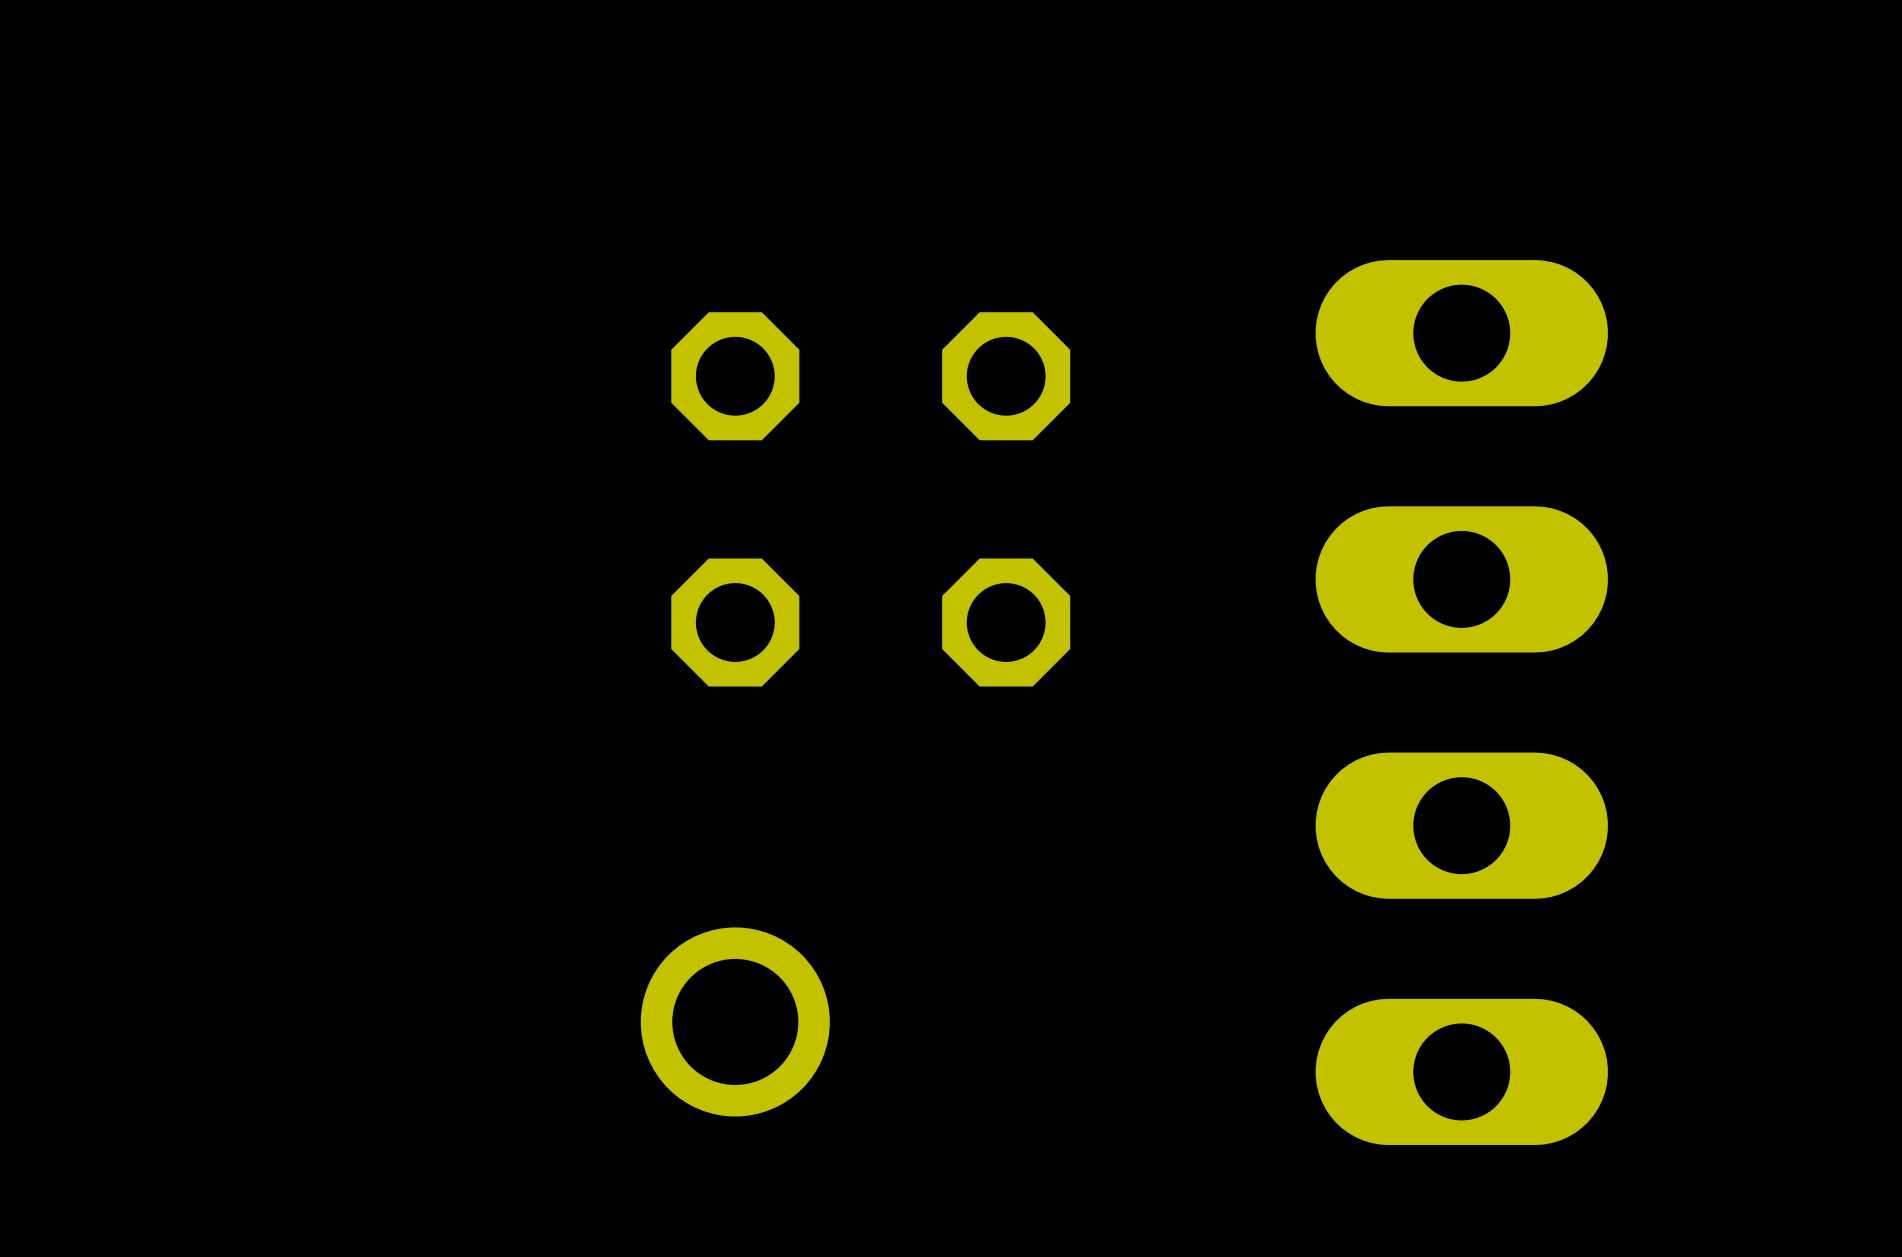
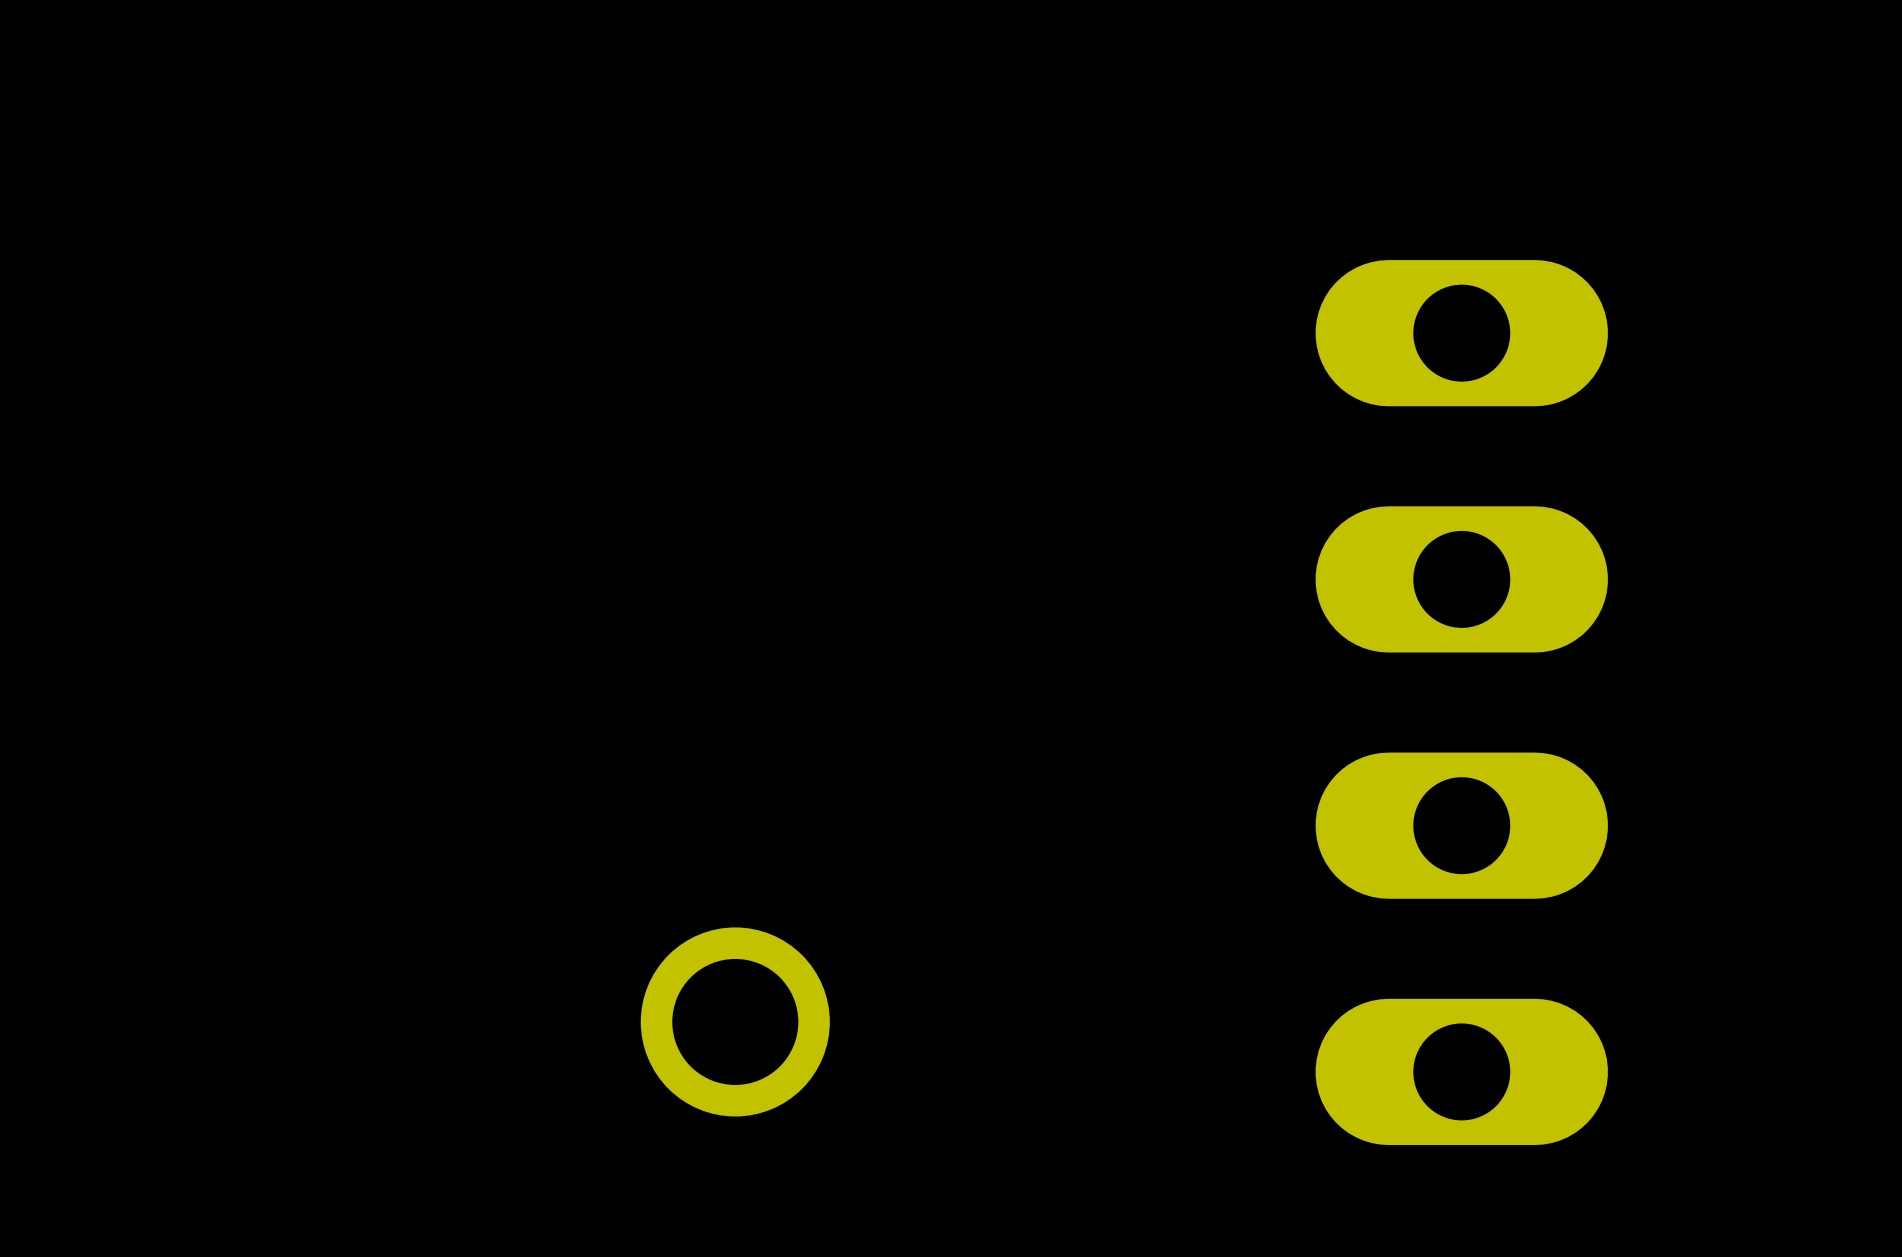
part: (735, 499) -> none
part: (1006, 499) -> none

